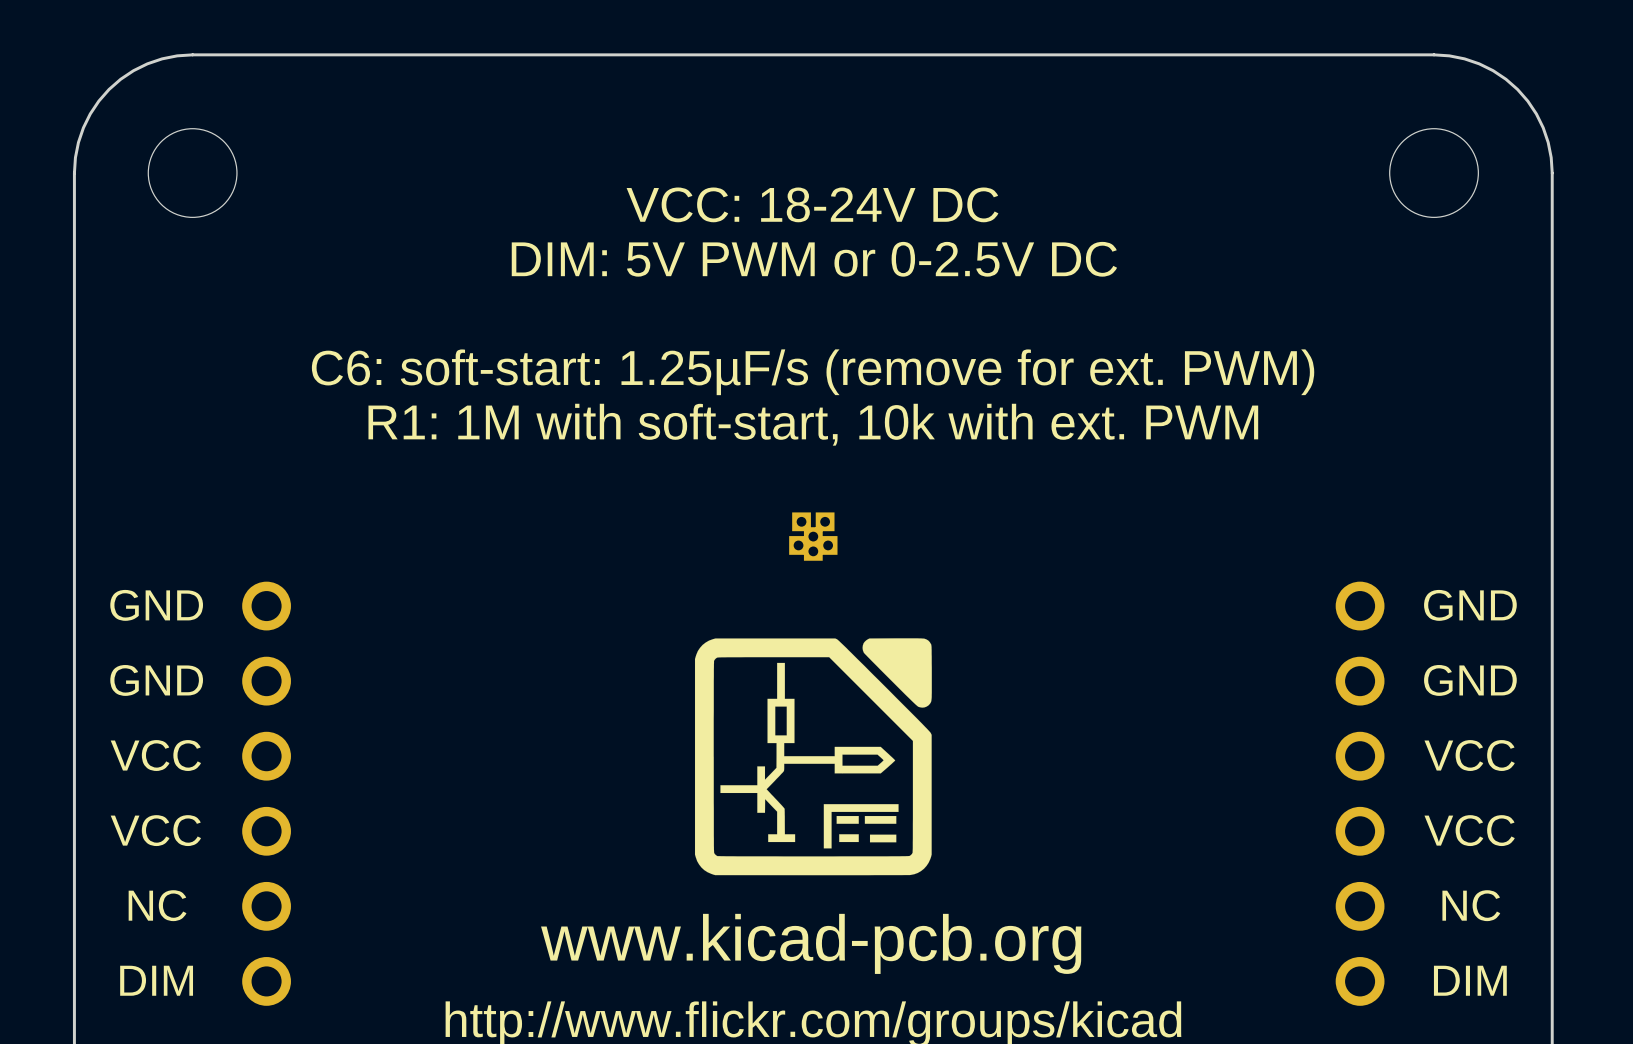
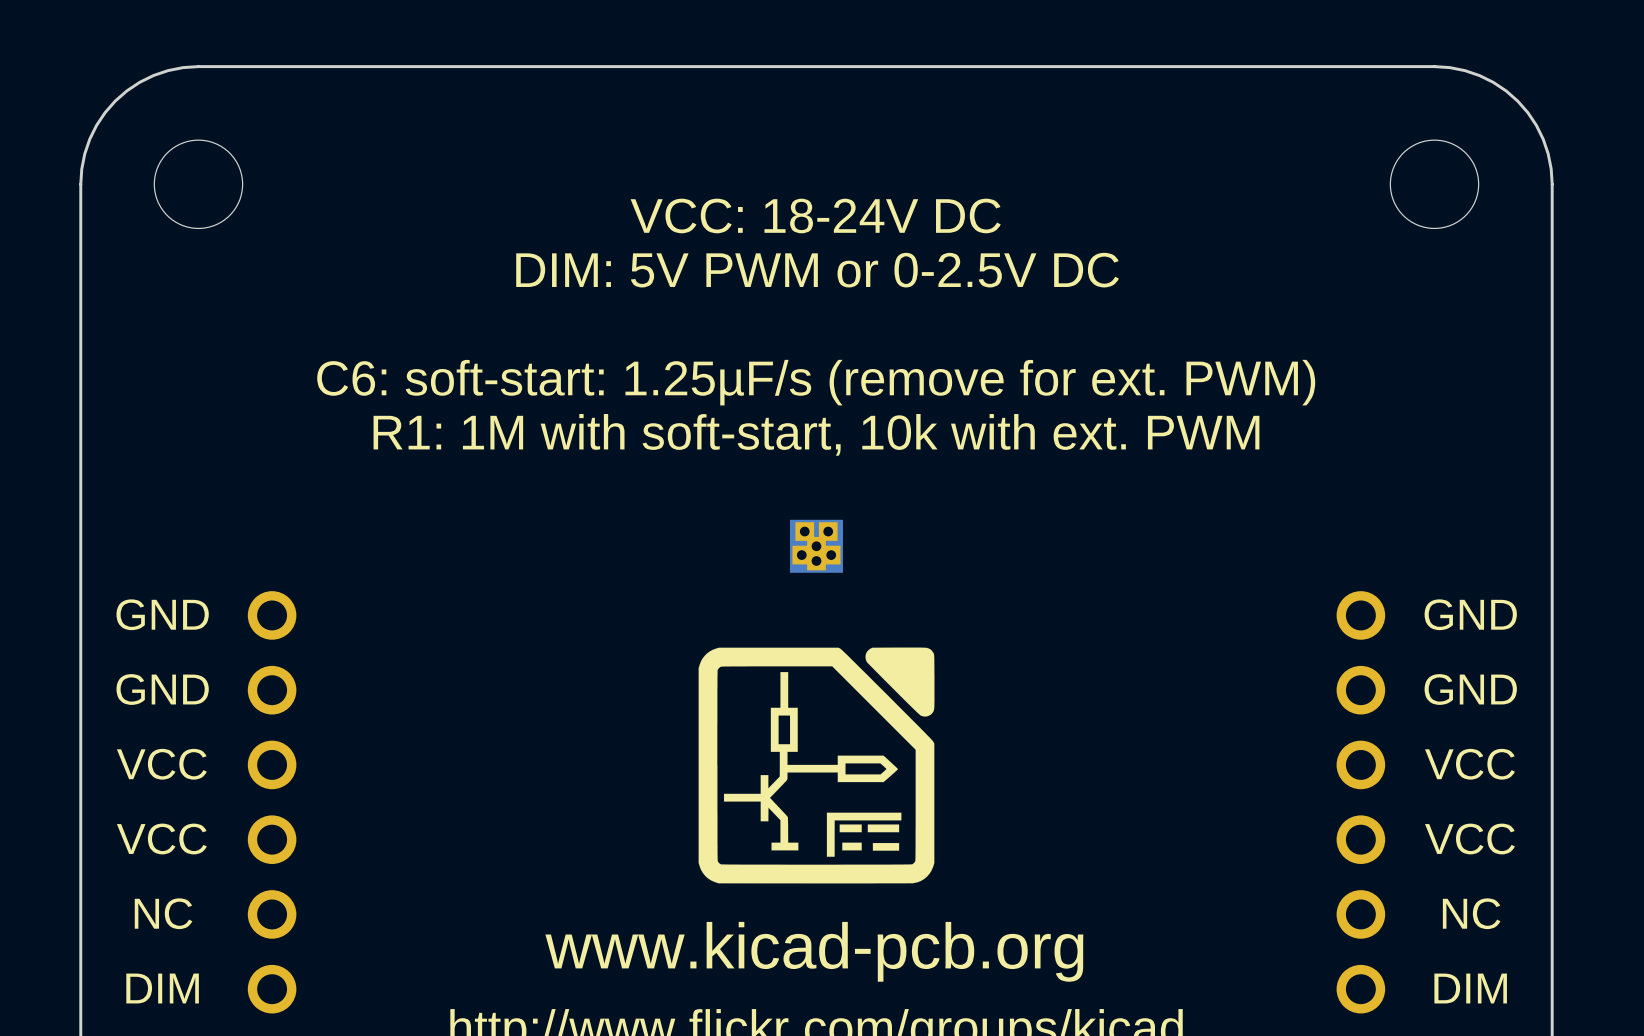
part footprint: [789, 512, 838, 561] -> [790, 519, 843, 573]

